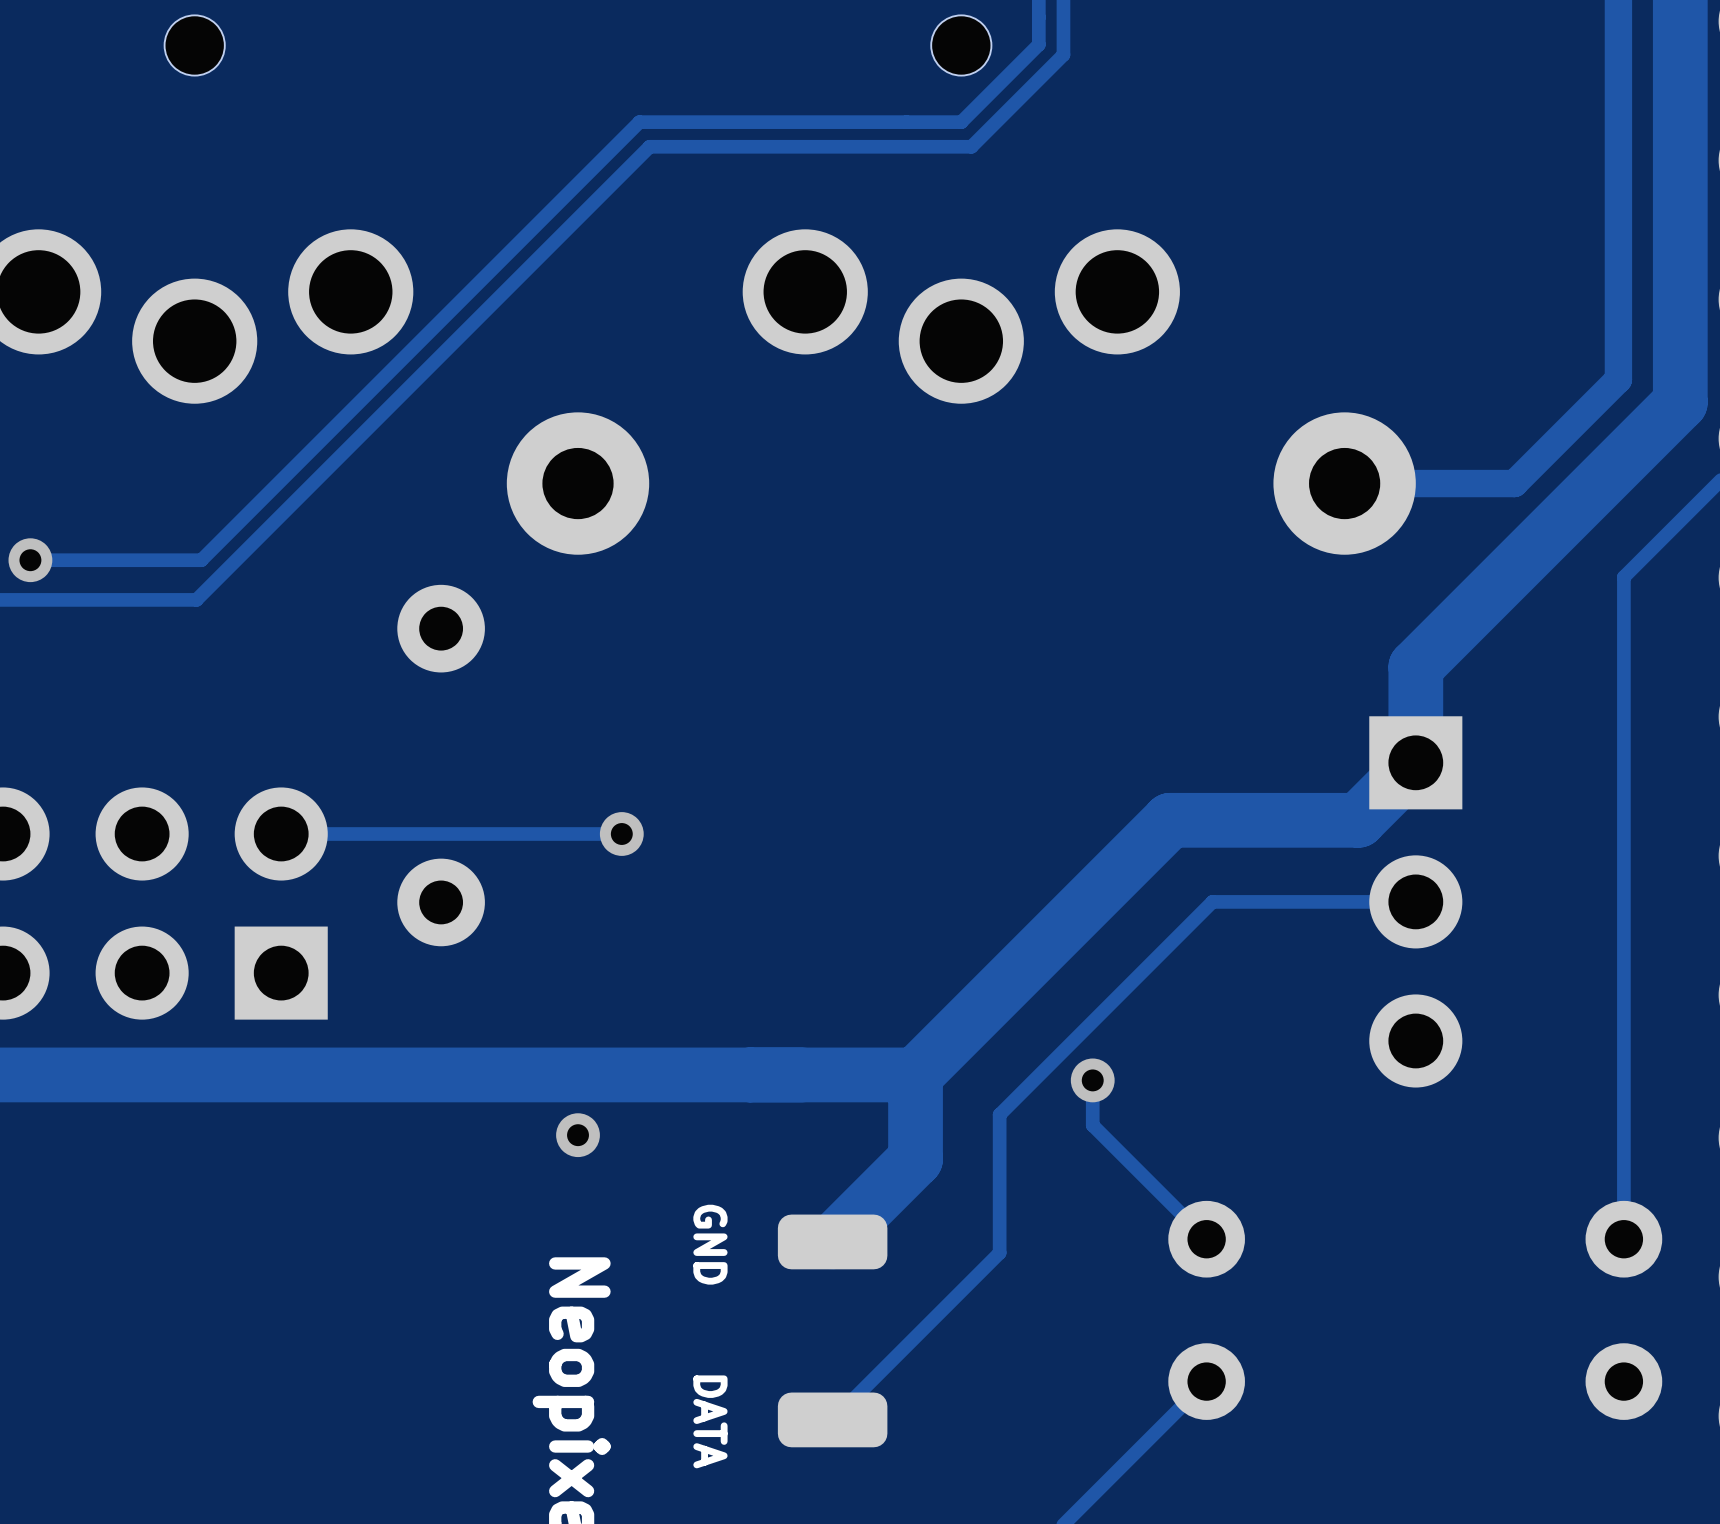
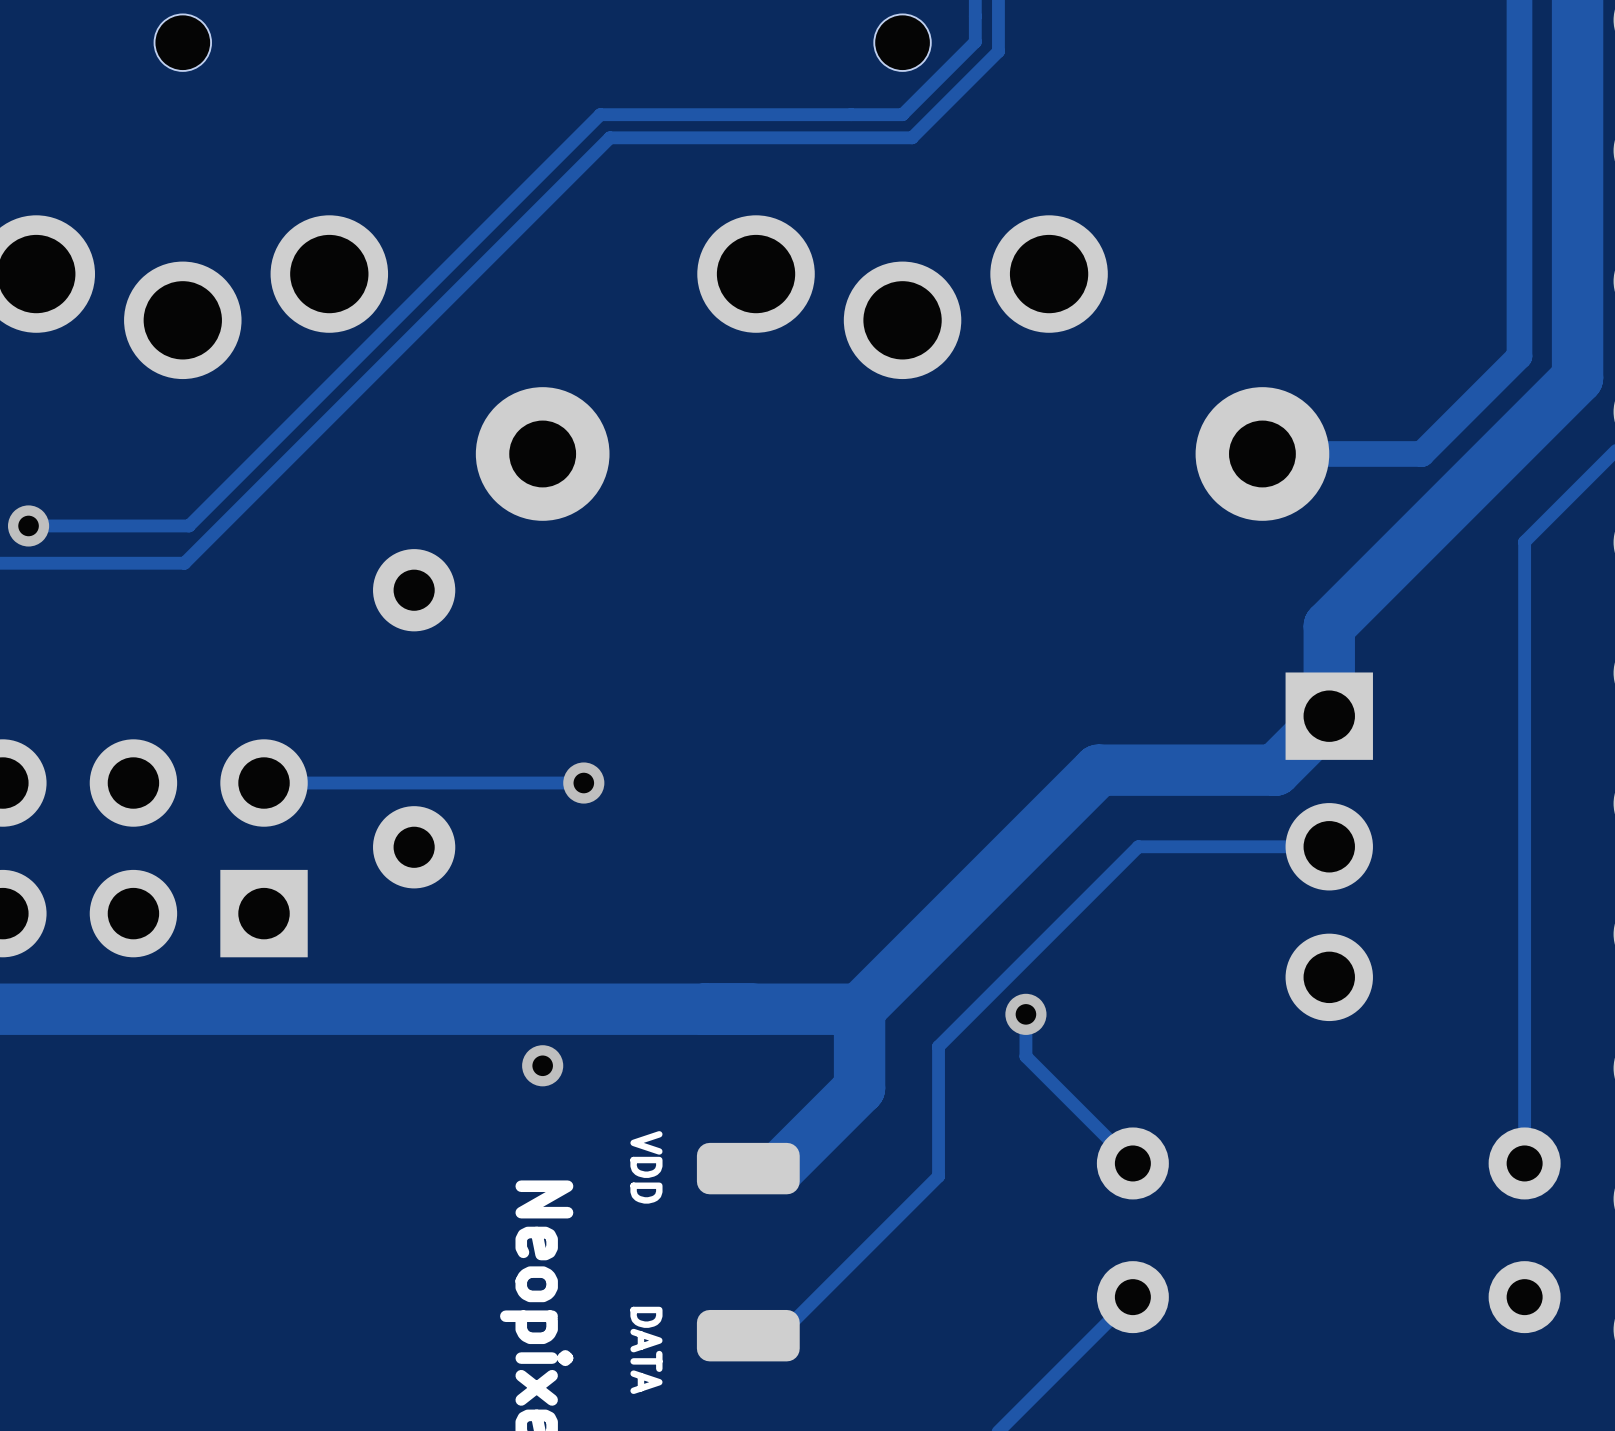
GND position: (832, 1241) -> (748, 1168)
text: none -> VDD (646, 1167)
GND name: GND (710, 1244) -> none
DATA position: (832, 1419) -> (748, 1335)
DATA name: DATA (710, 1421) -> none
text: none -> DATA (646, 1350)

